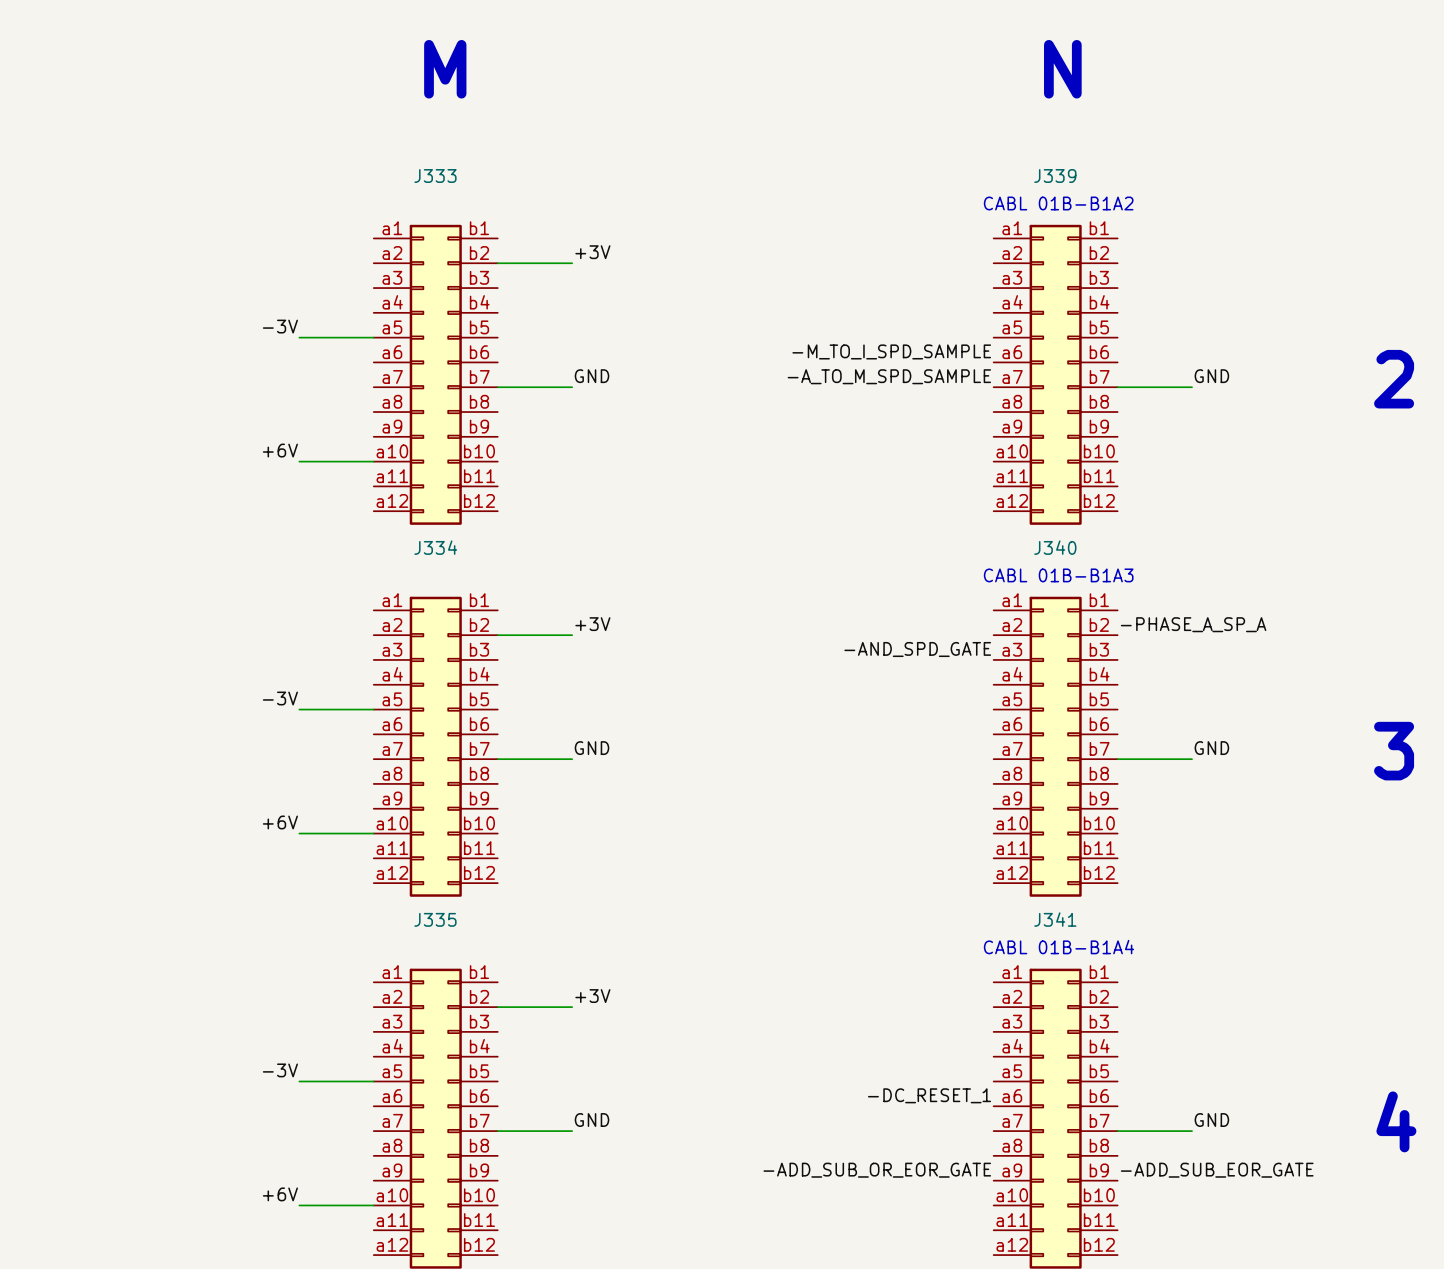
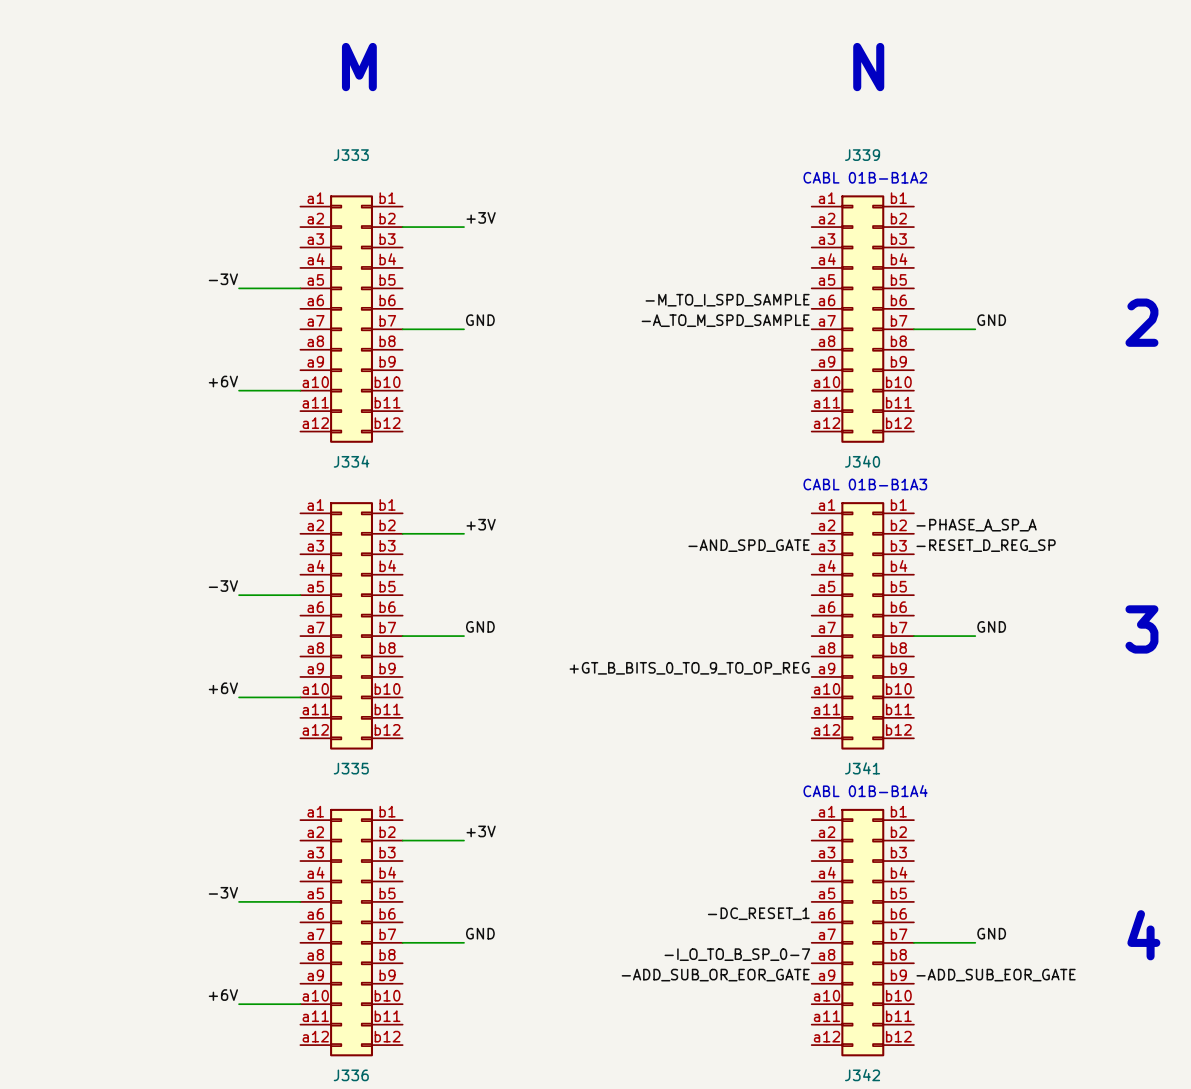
label: none -> -RESET_D_REG_SP (986, 545)
label: none -> +GT_B_BITS_0_TO_9_TO_OP_REG (689, 668)
label: none -> -I_O_TO_B_SP_0-7 (737, 954)

